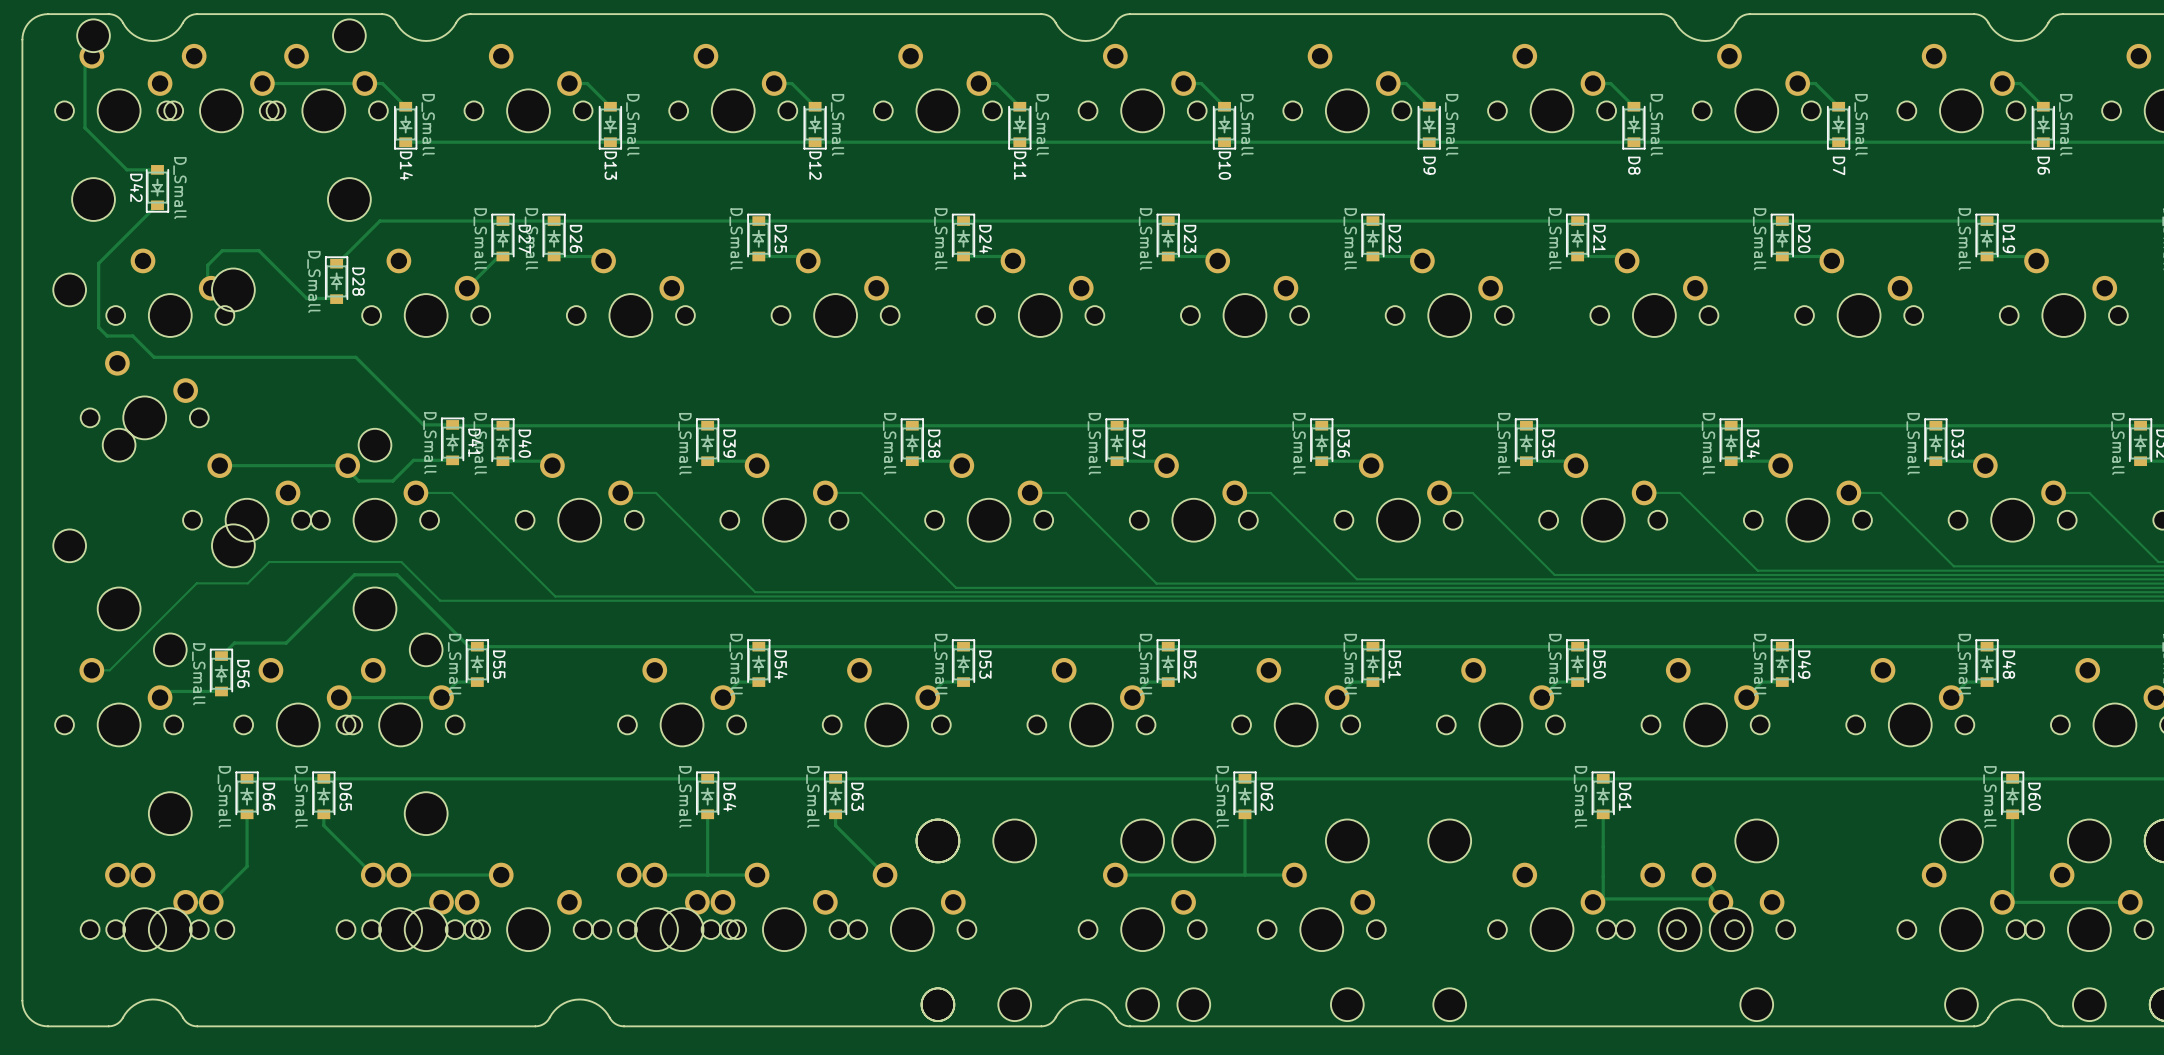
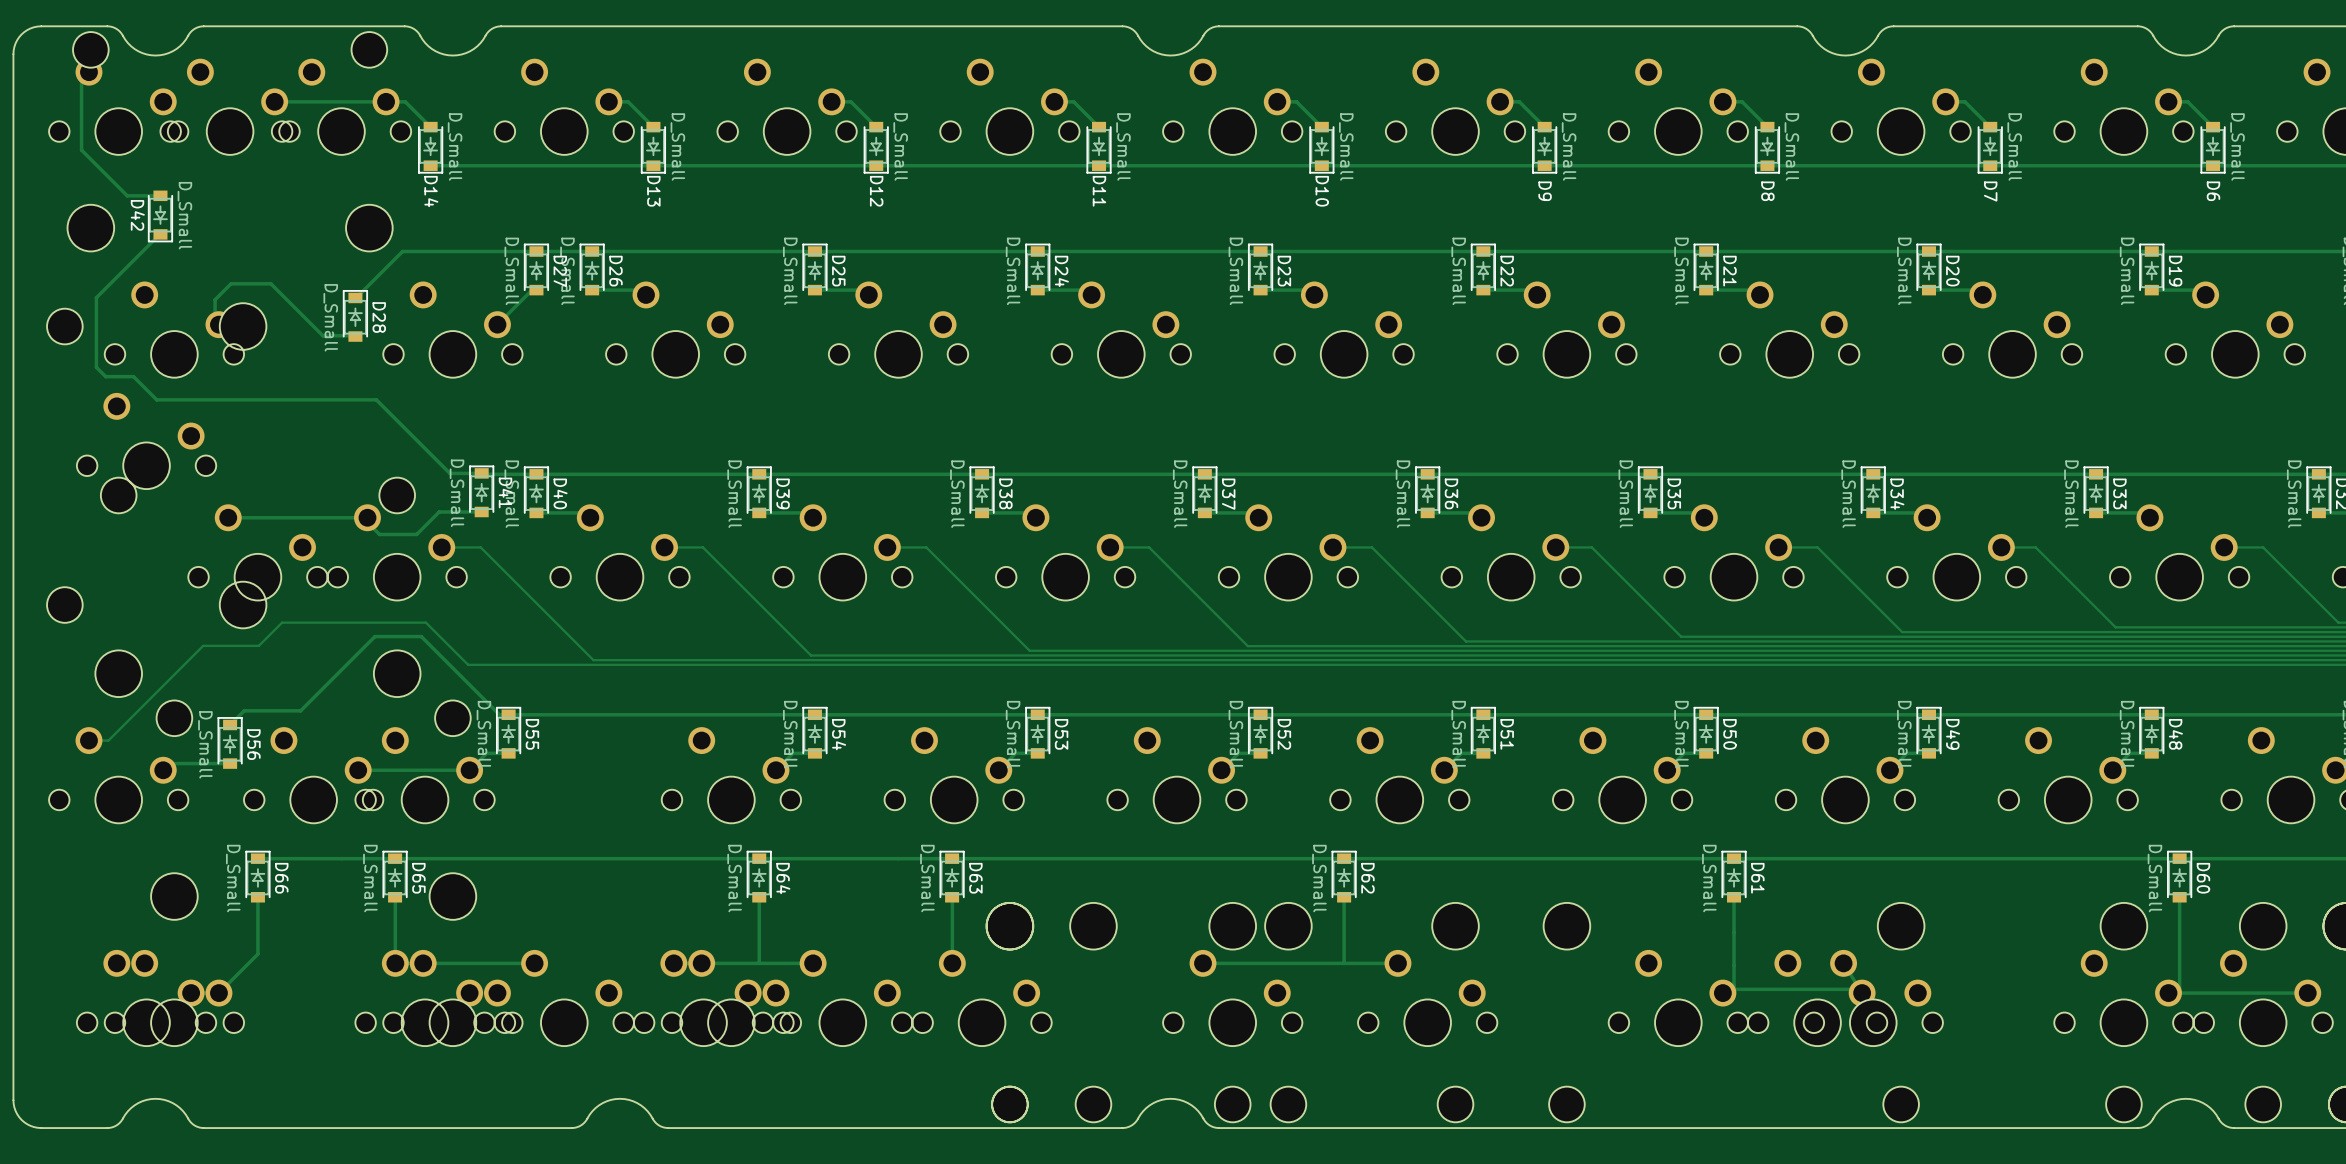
D65 position: (323, 795) -> (395, 876)
D63 position: (835, 795) -> (952, 876)
track: (323, 814) (323, 825) (373, 875) -> (395, 897) (395, 963)
track: (835, 814) (835, 825) (885, 875) -> (952, 897) (952, 963)

